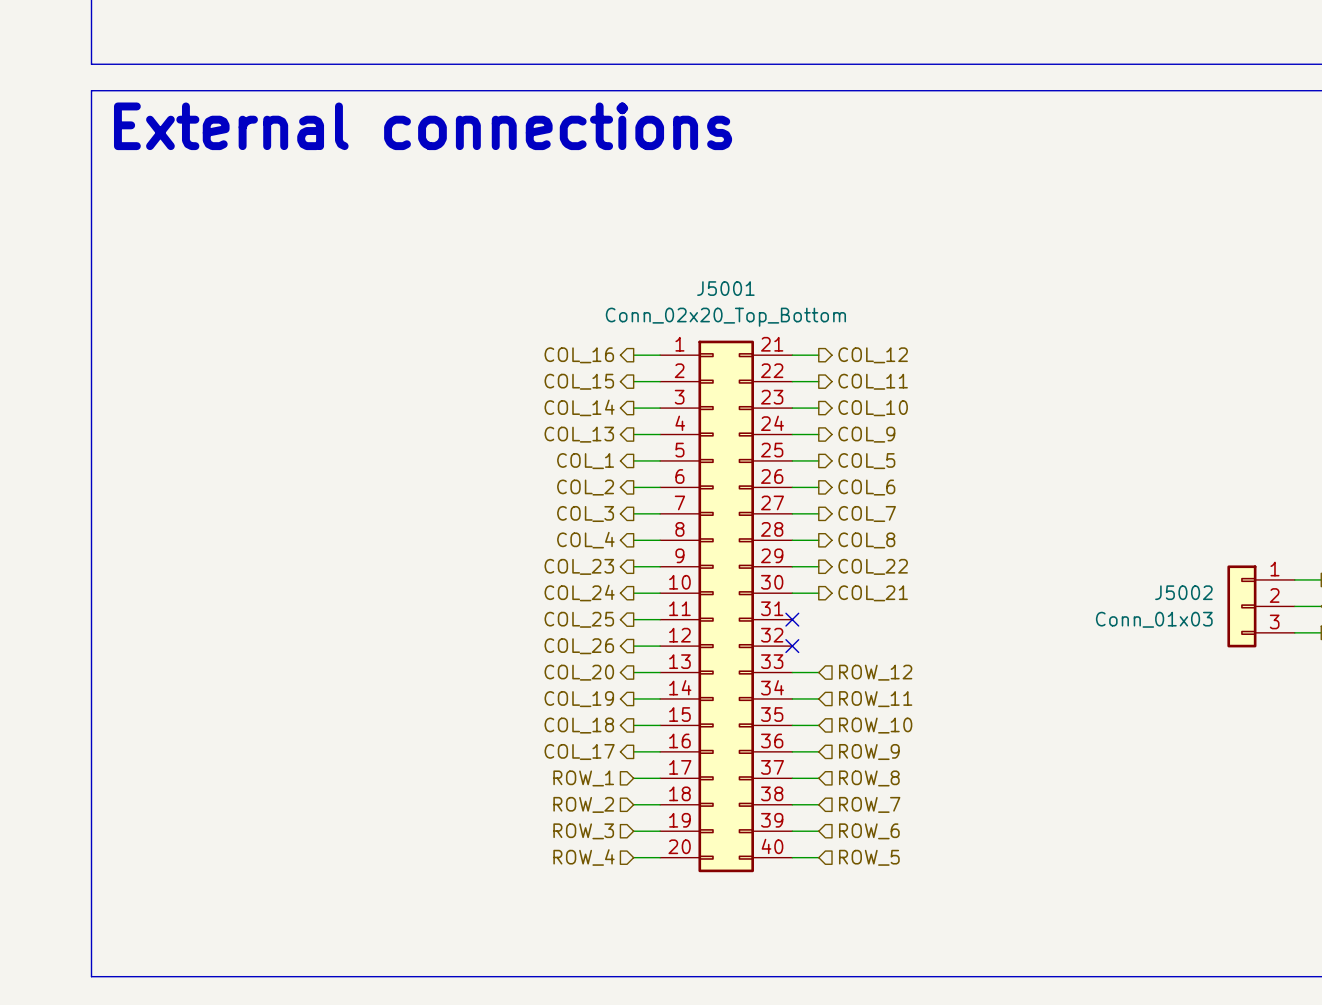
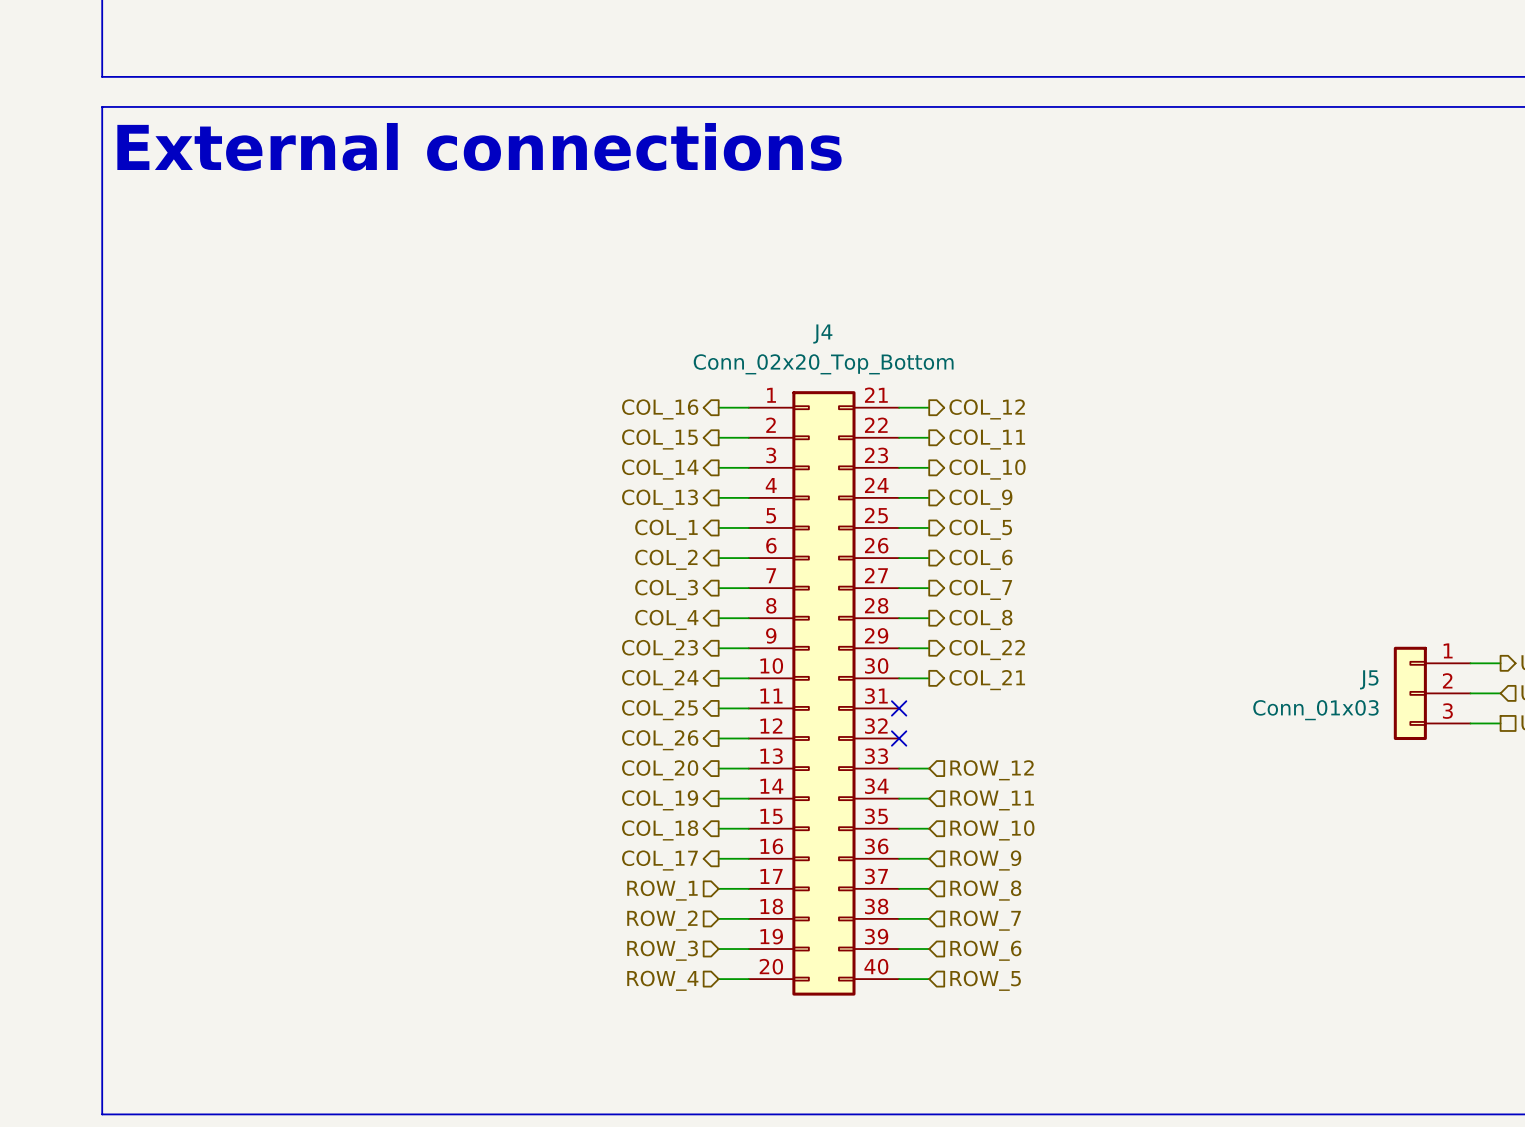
J5001 name: J5001 (725, 288) -> J4 (822, 334)
J5002 name: J5002 (1183, 592) -> J5 (1369, 679)

